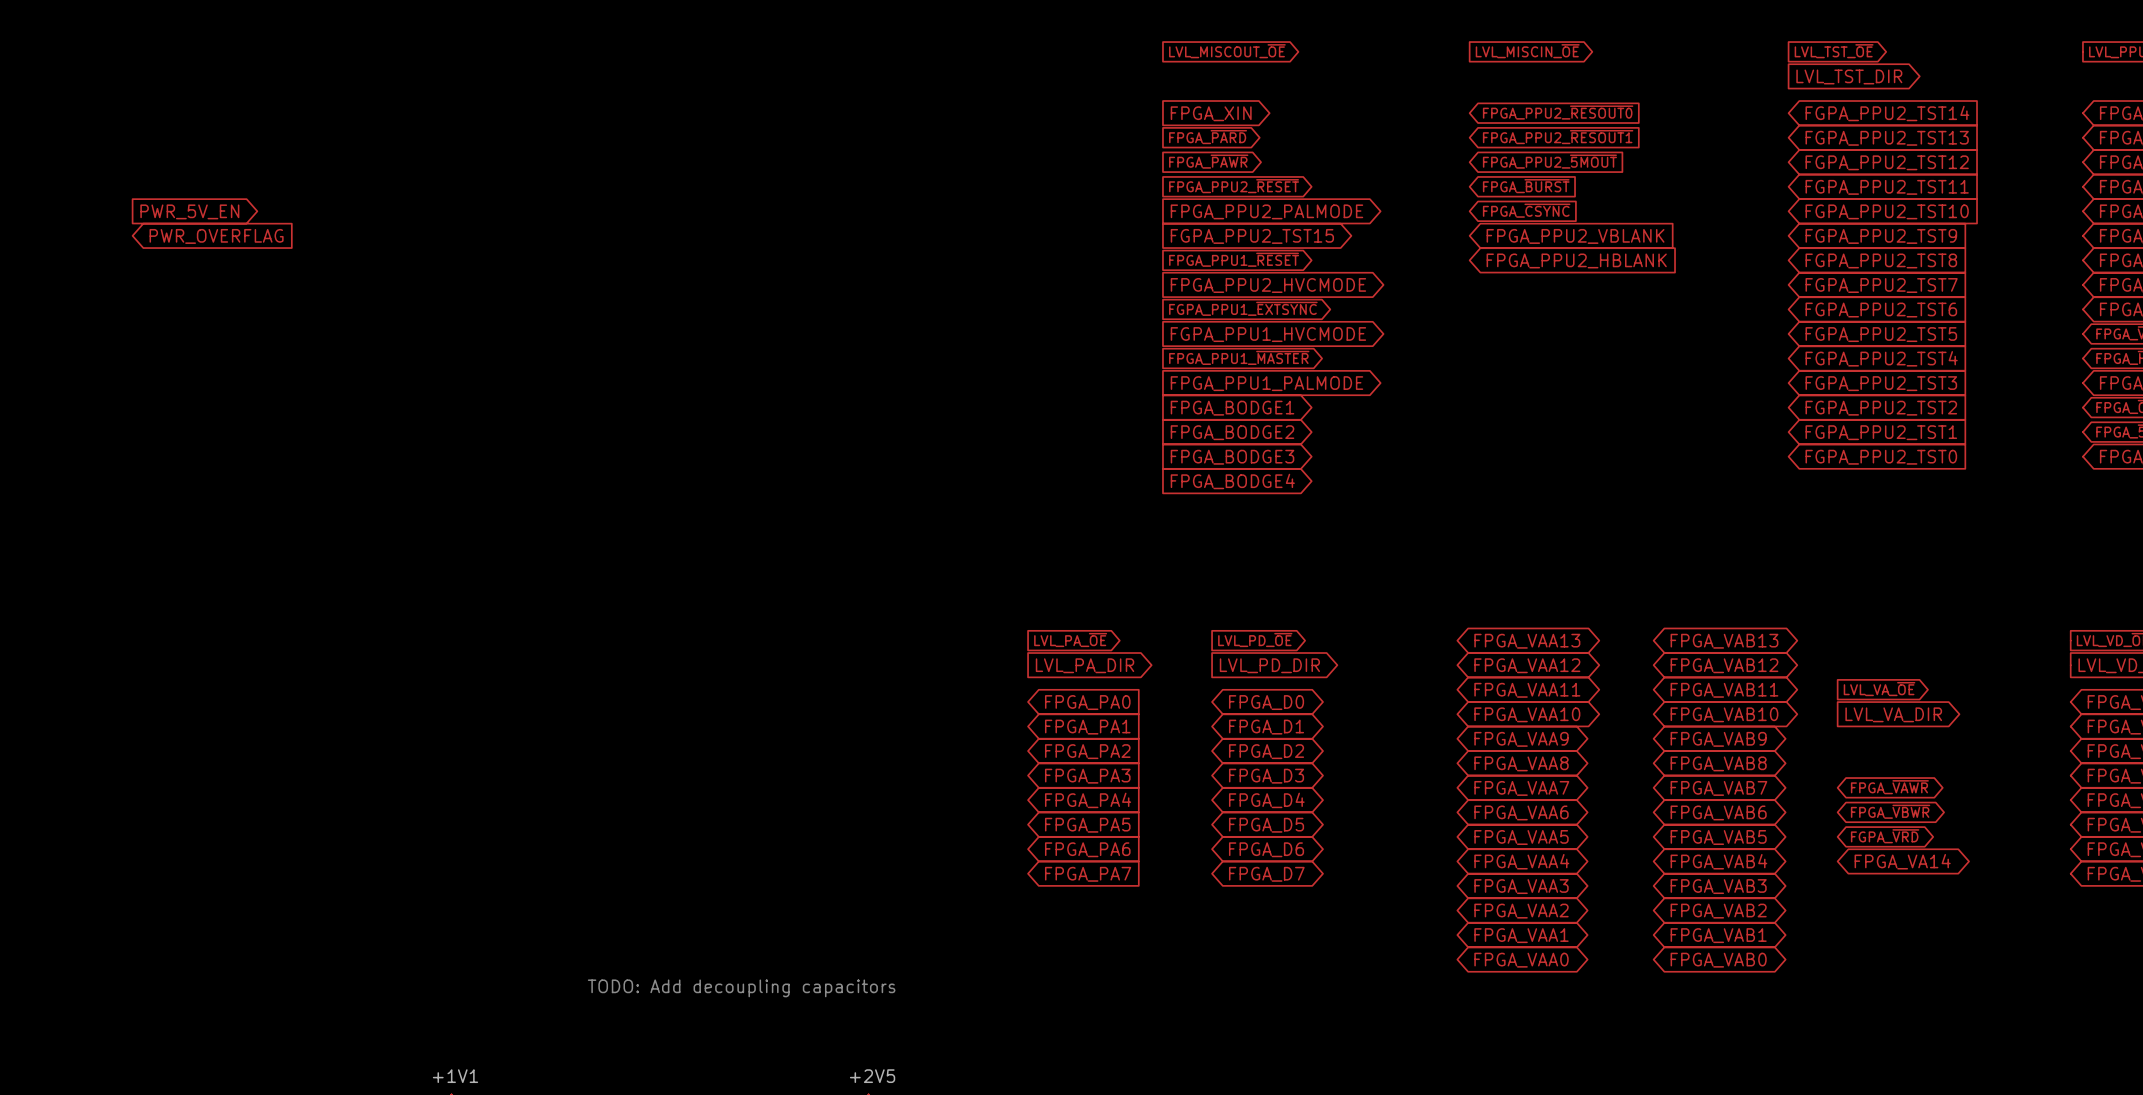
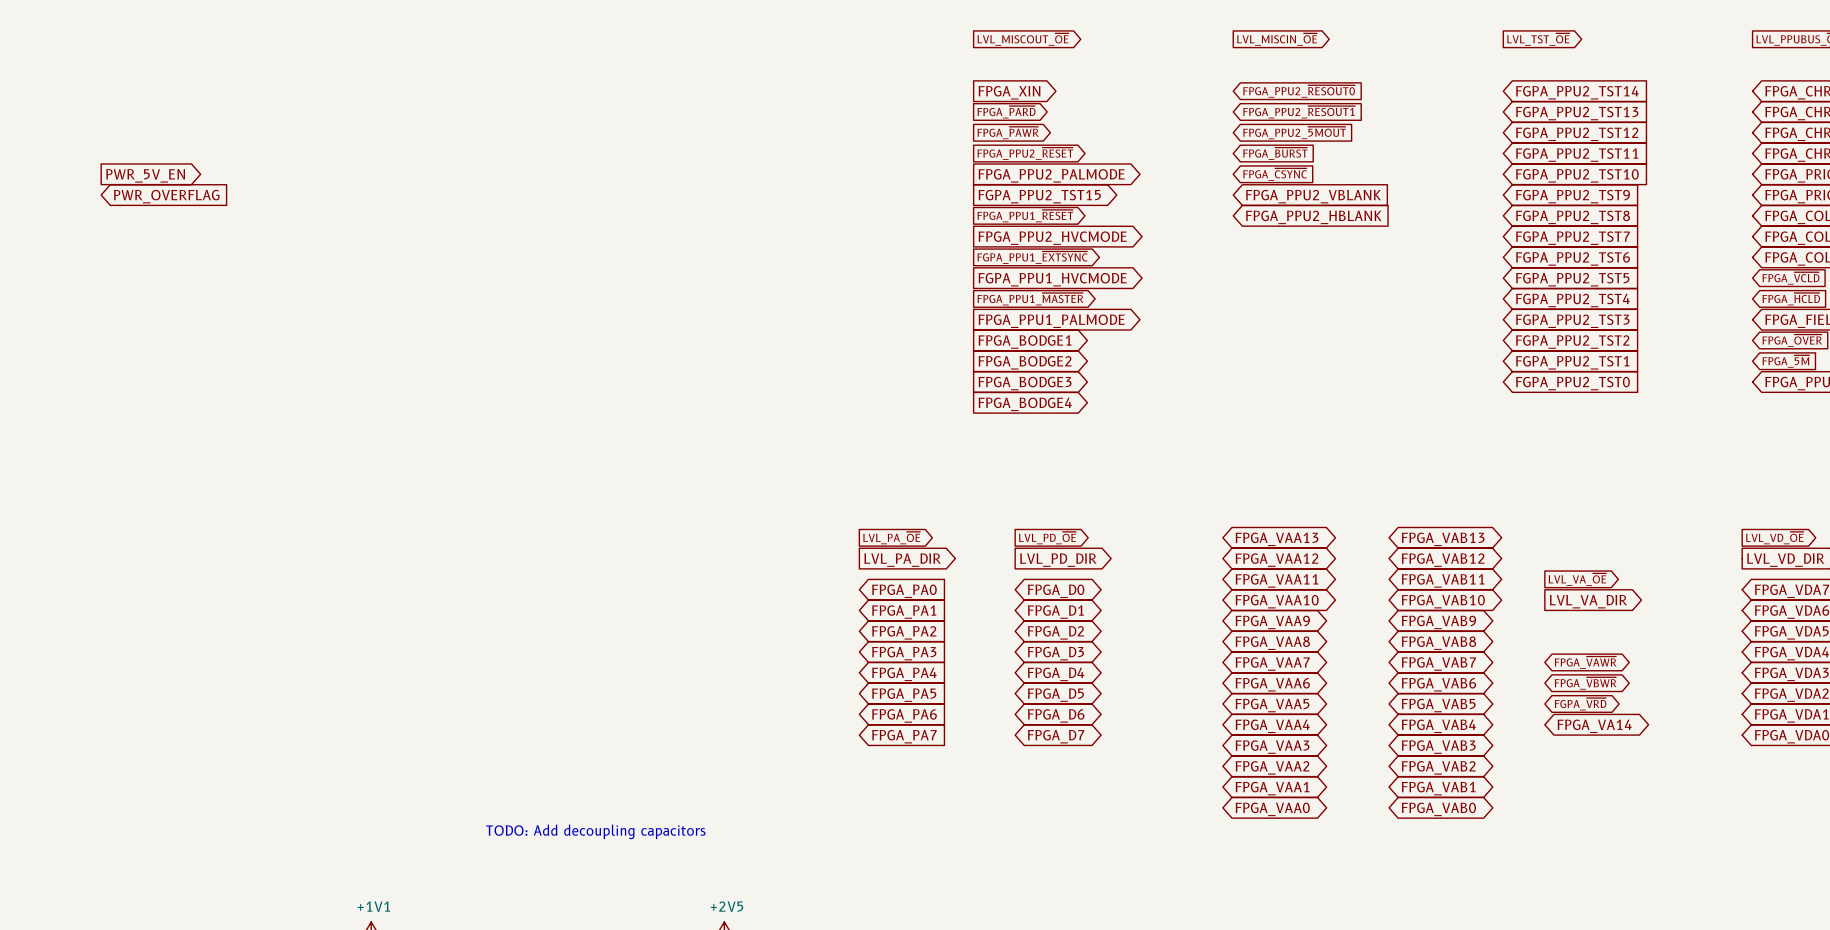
global label: LVL_TST_DIR (1849, 76) -> none

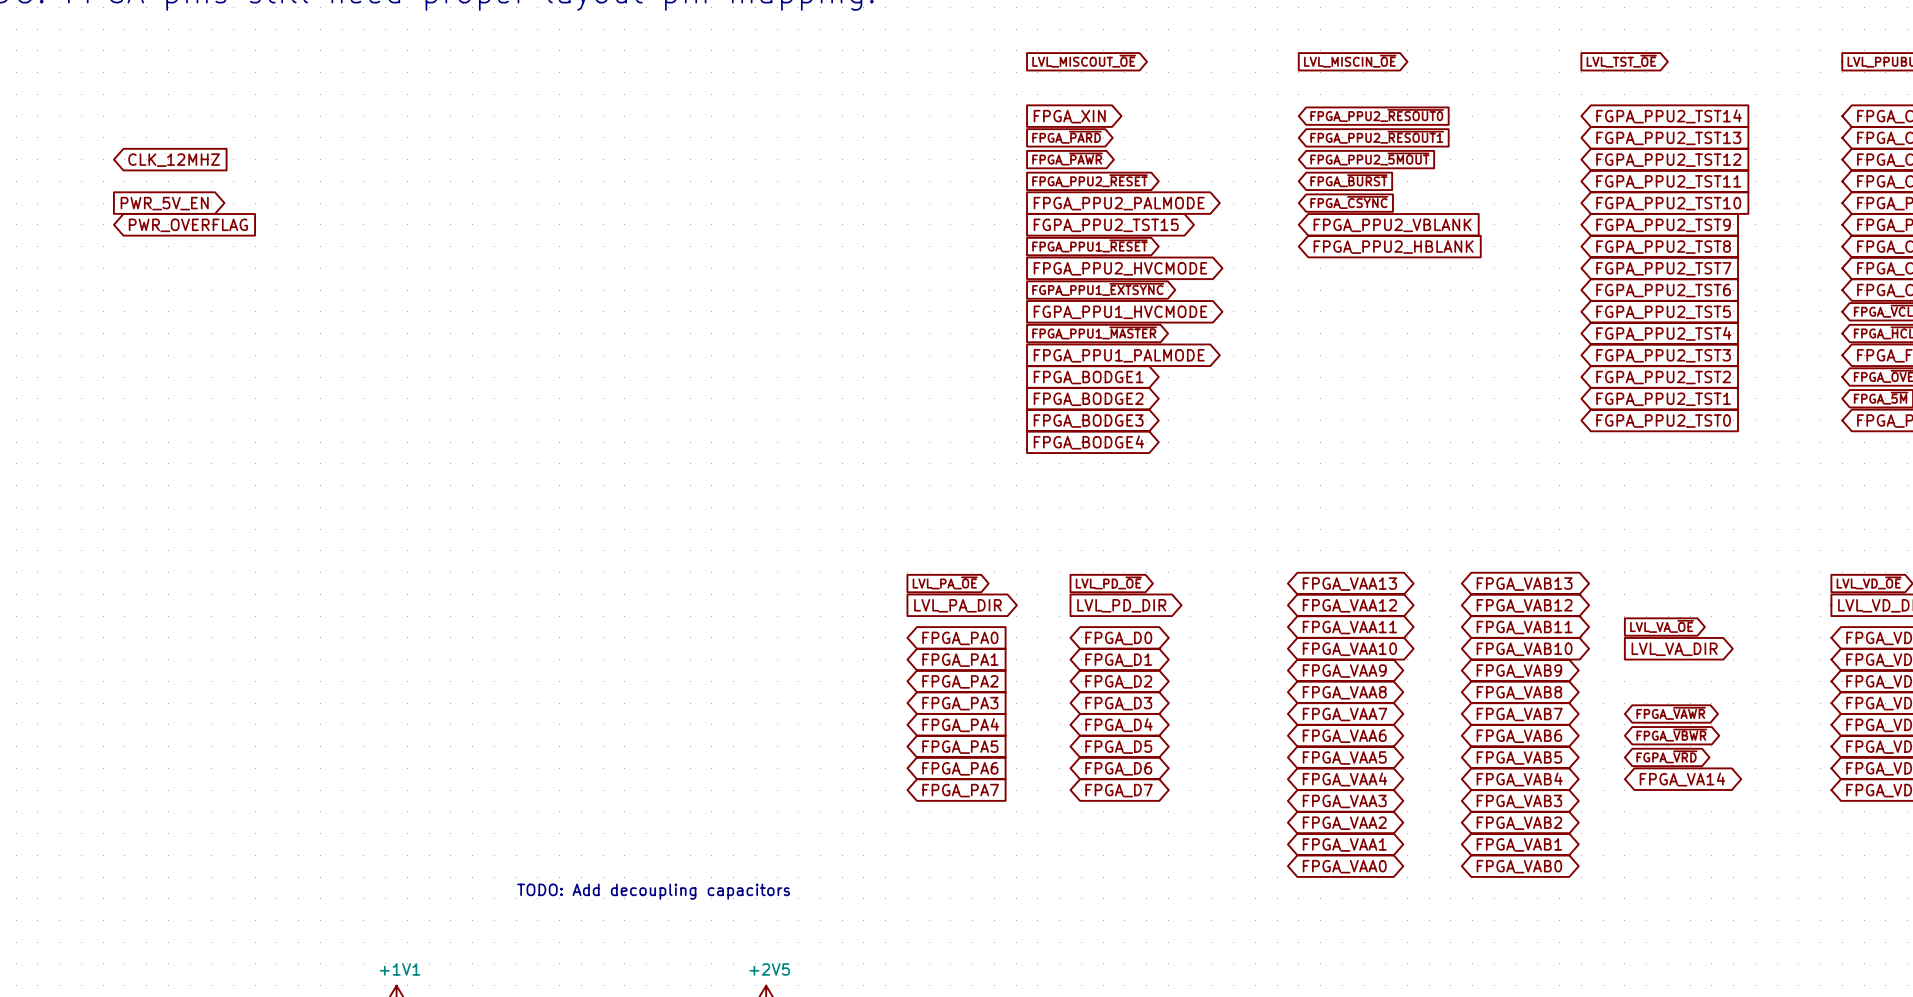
global label: none -> CLK_12MHZ (174, 160)

